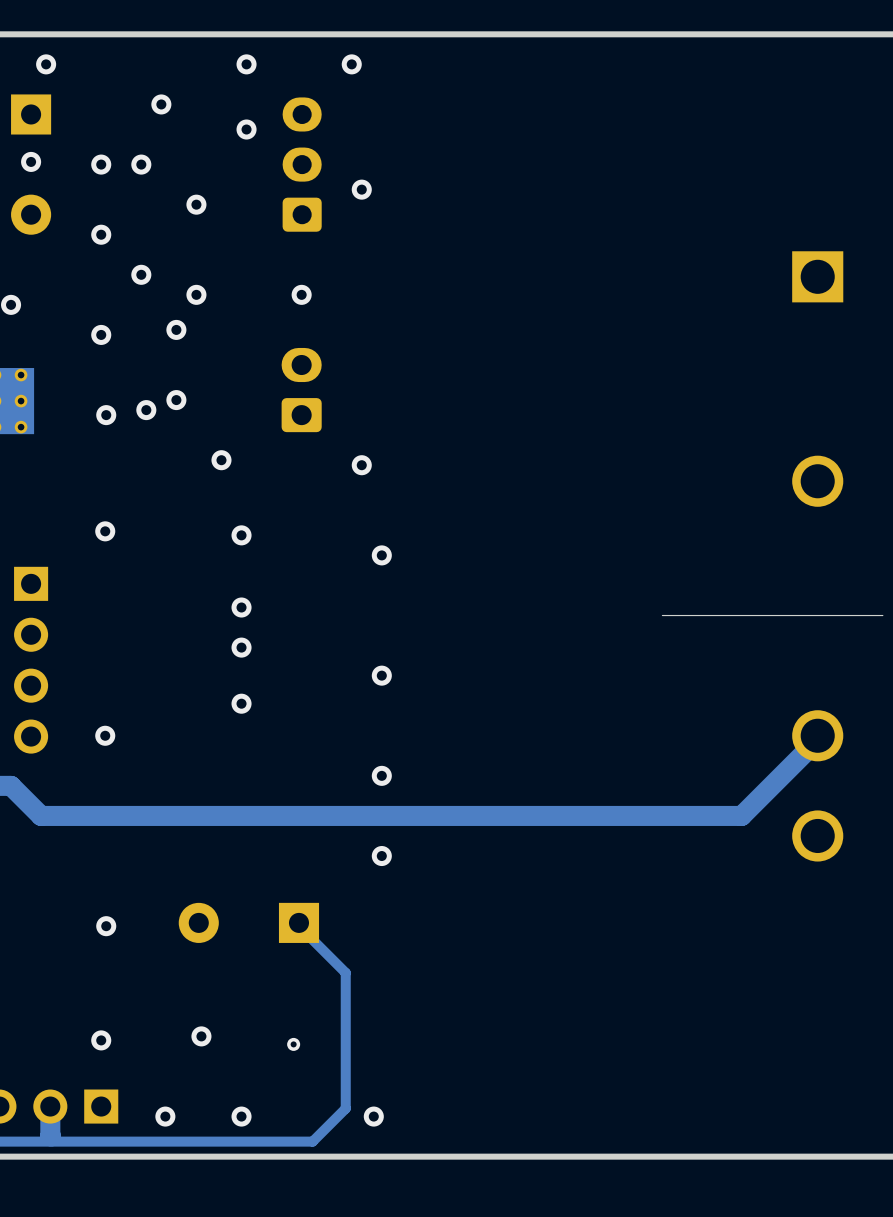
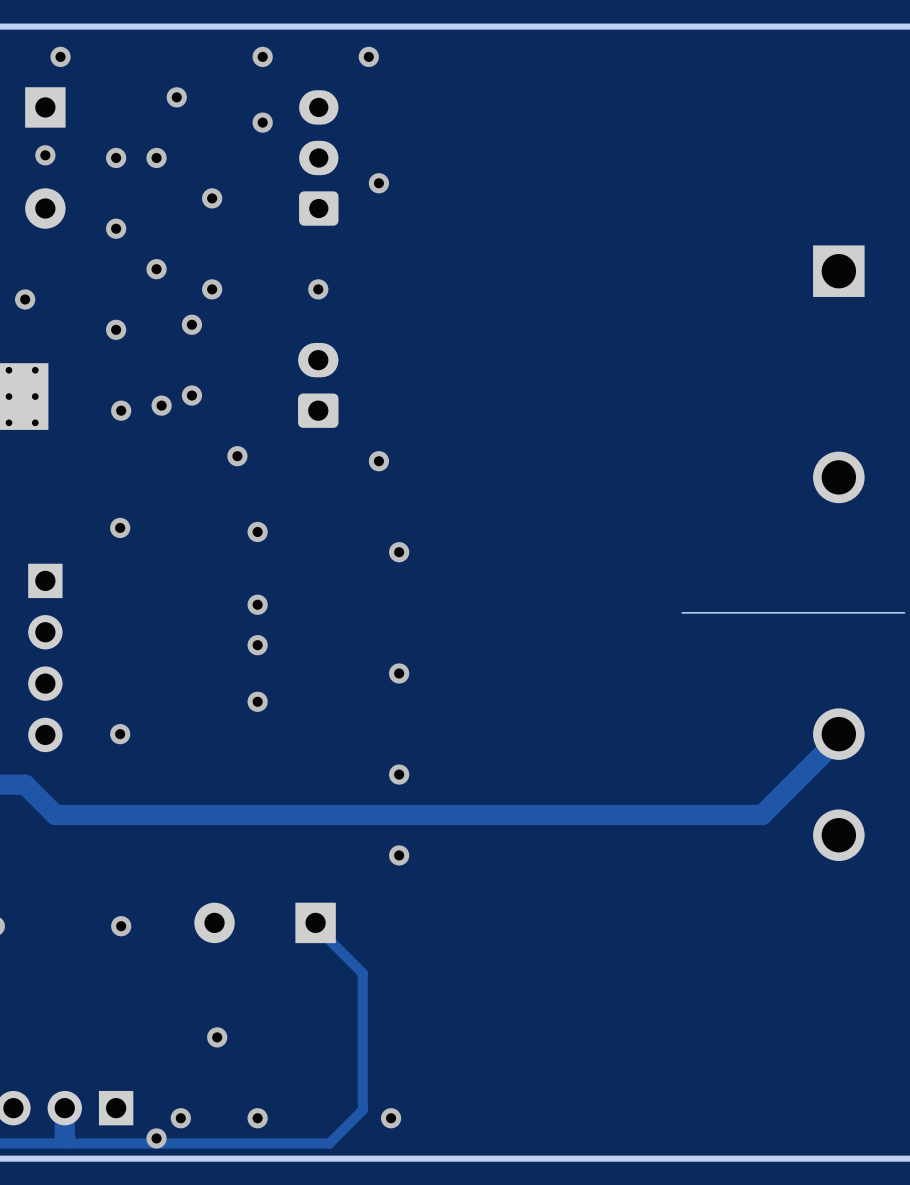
via position: (101, 1040) -> (156, 1138)
via: (293, 1044) -> none

